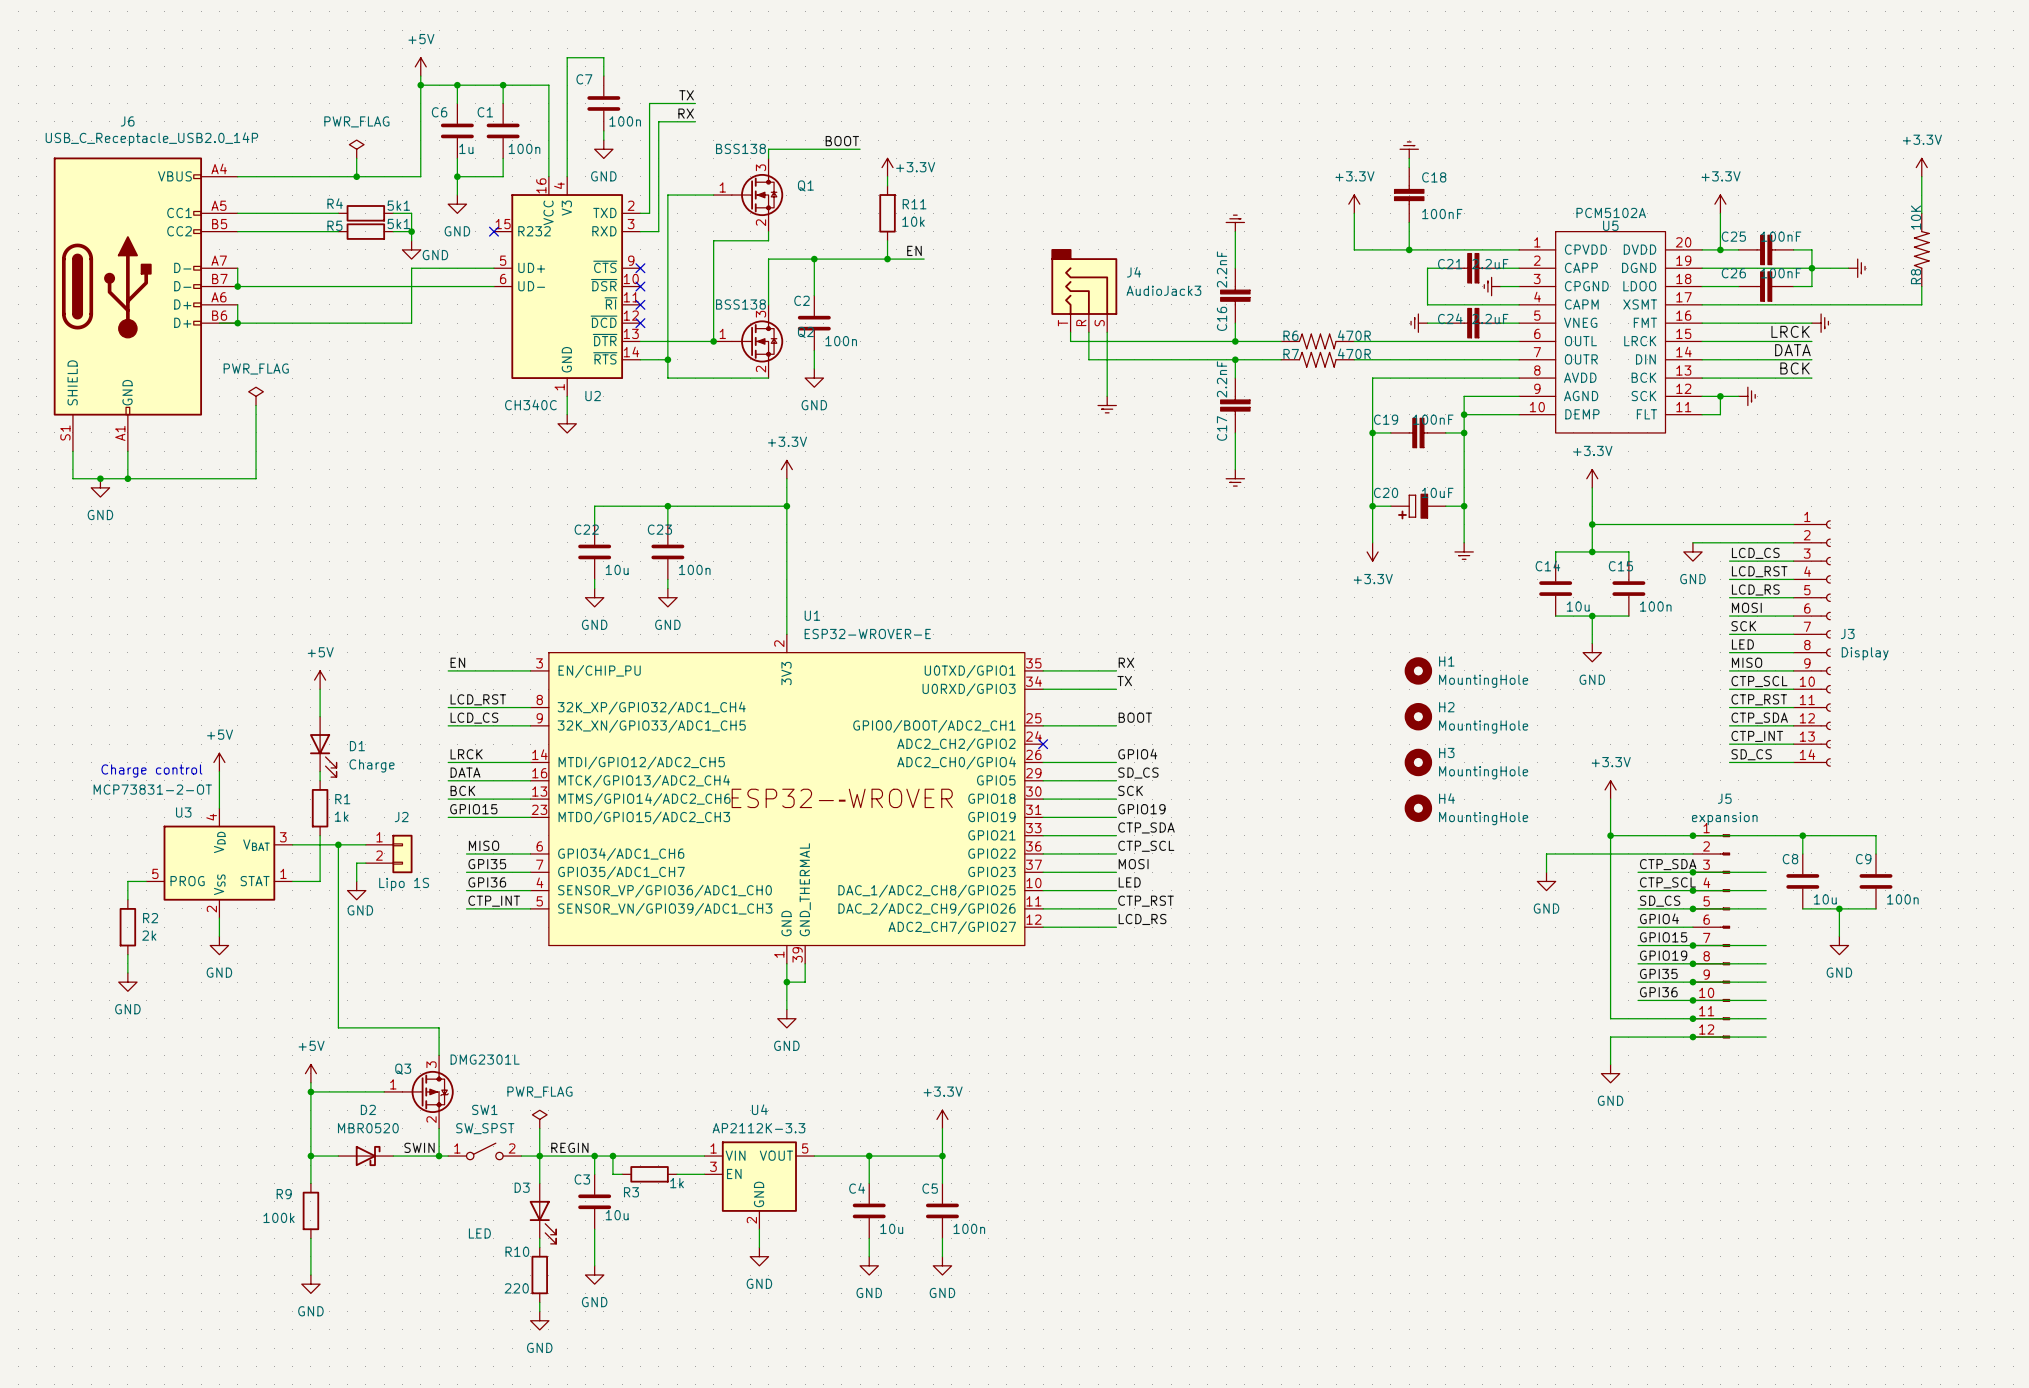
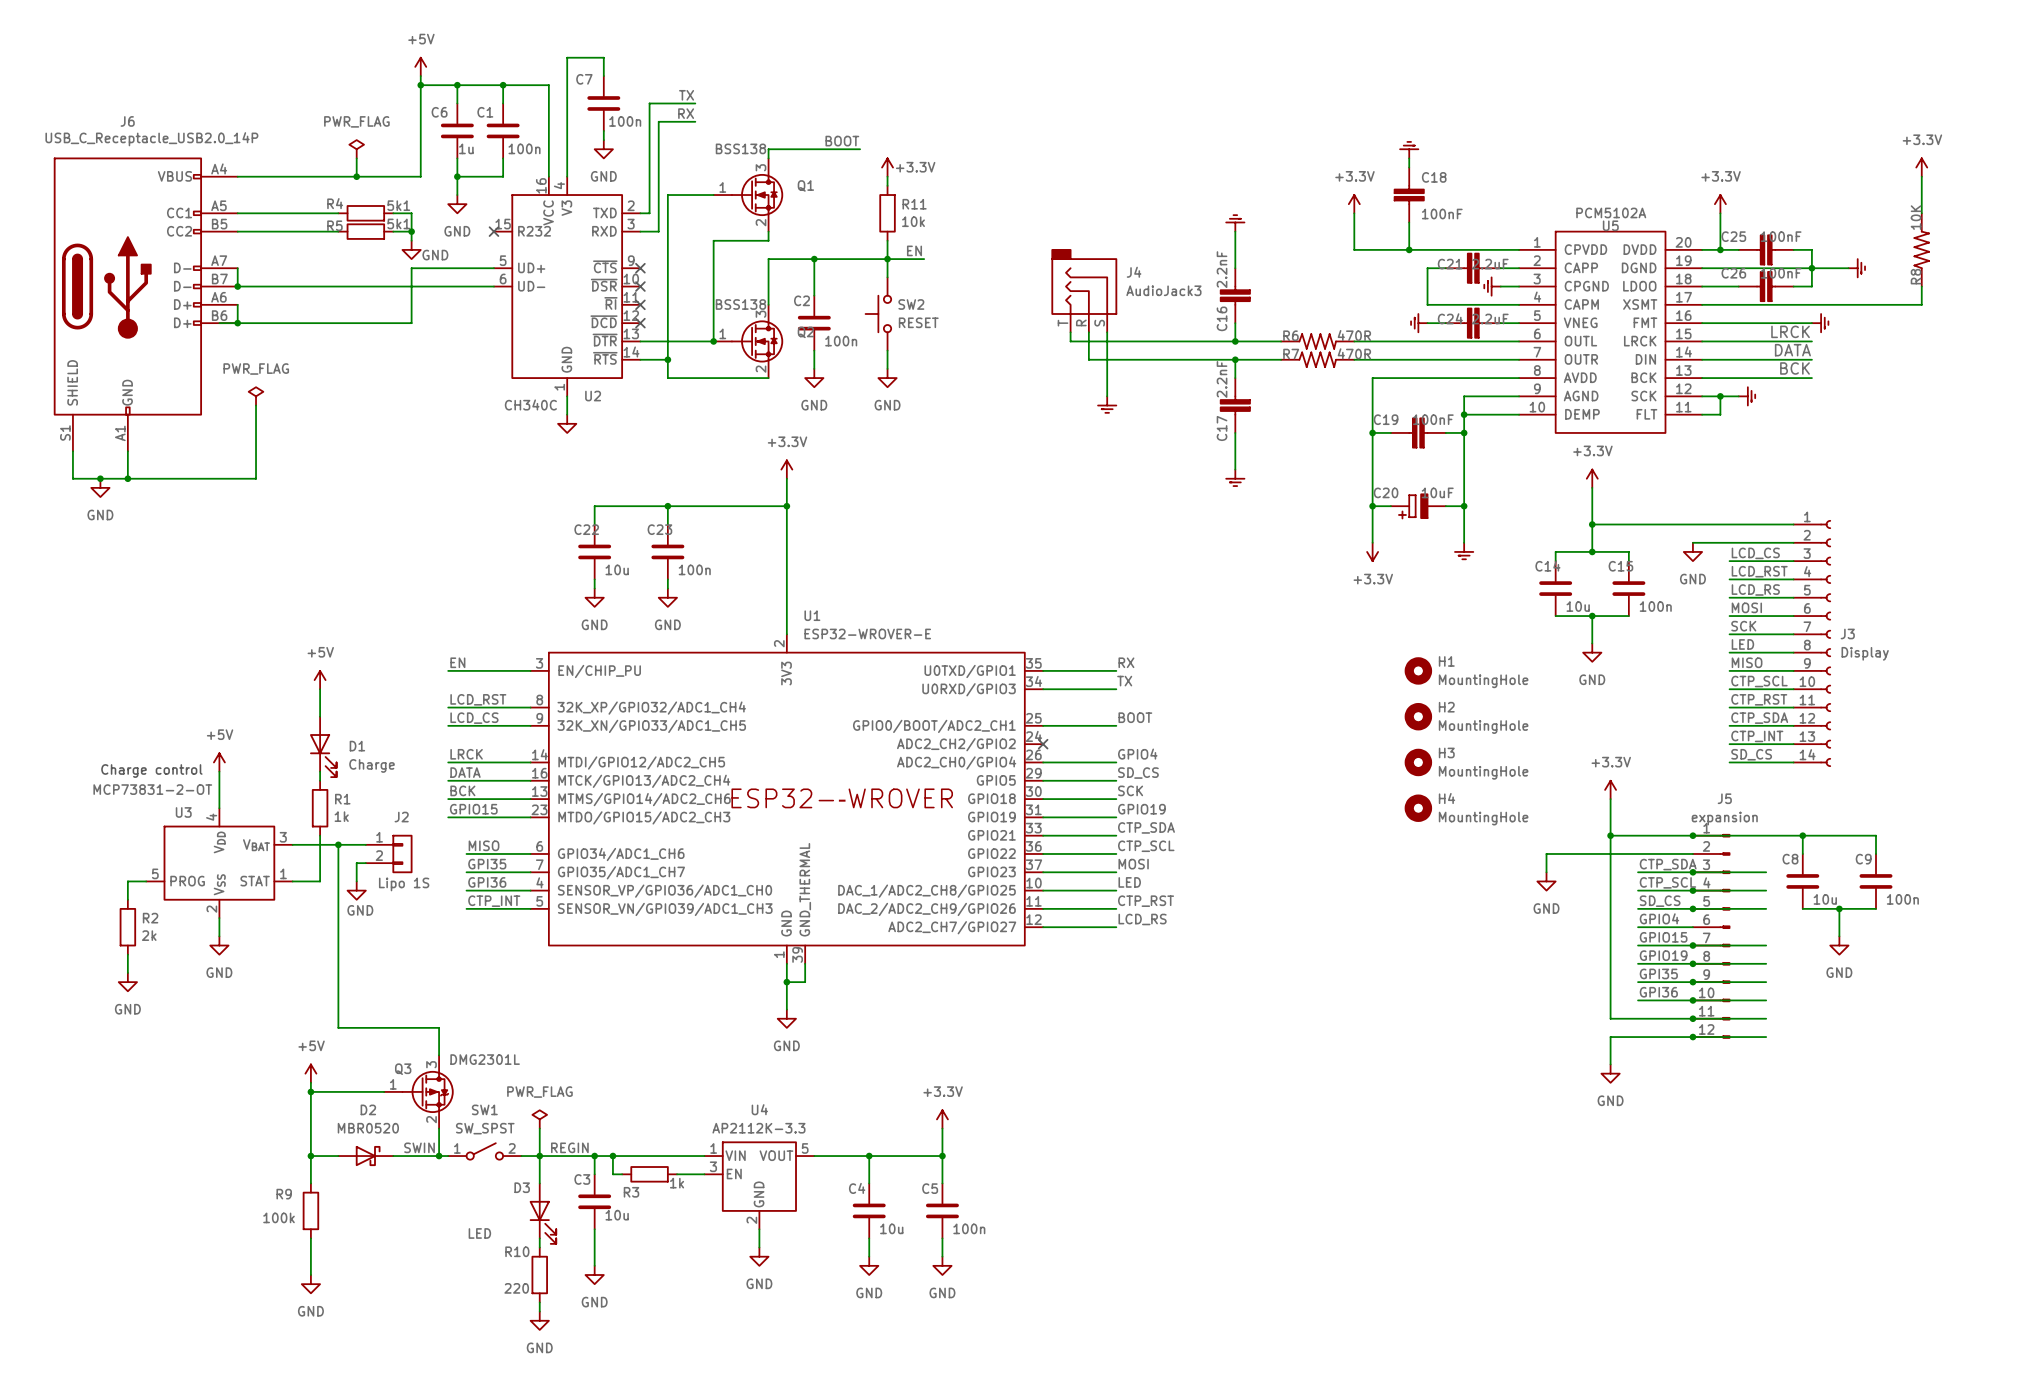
wire: none -> (887, 259) (887, 277)
SW2: none -> RESET (878, 313)
wire: none -> (887, 350) (887, 368)
power symbol: none -> GND (887, 378)

